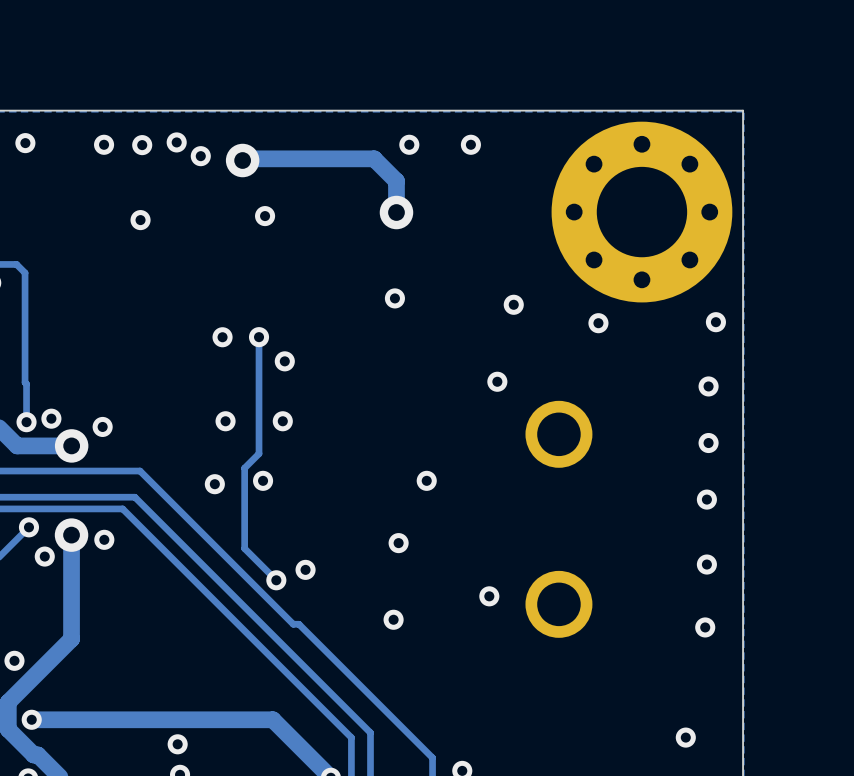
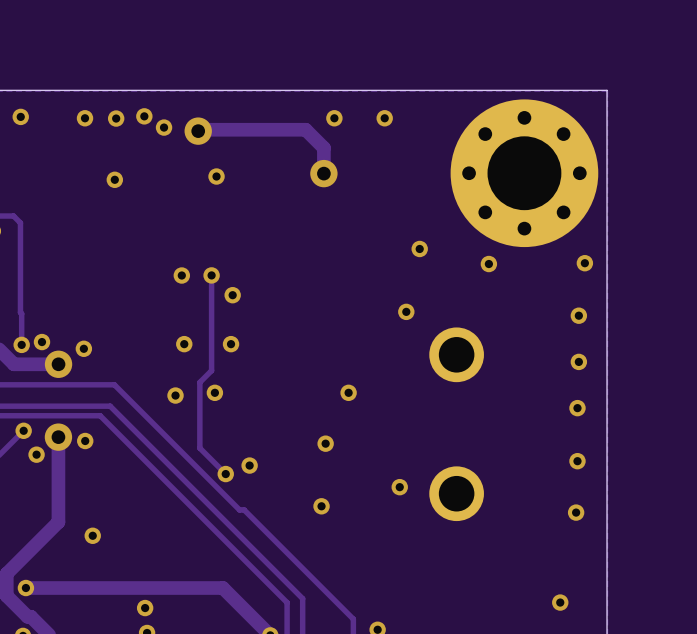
via: (394, 298) -> none
via: none -> (92, 535)
via: (14, 660) -> none

